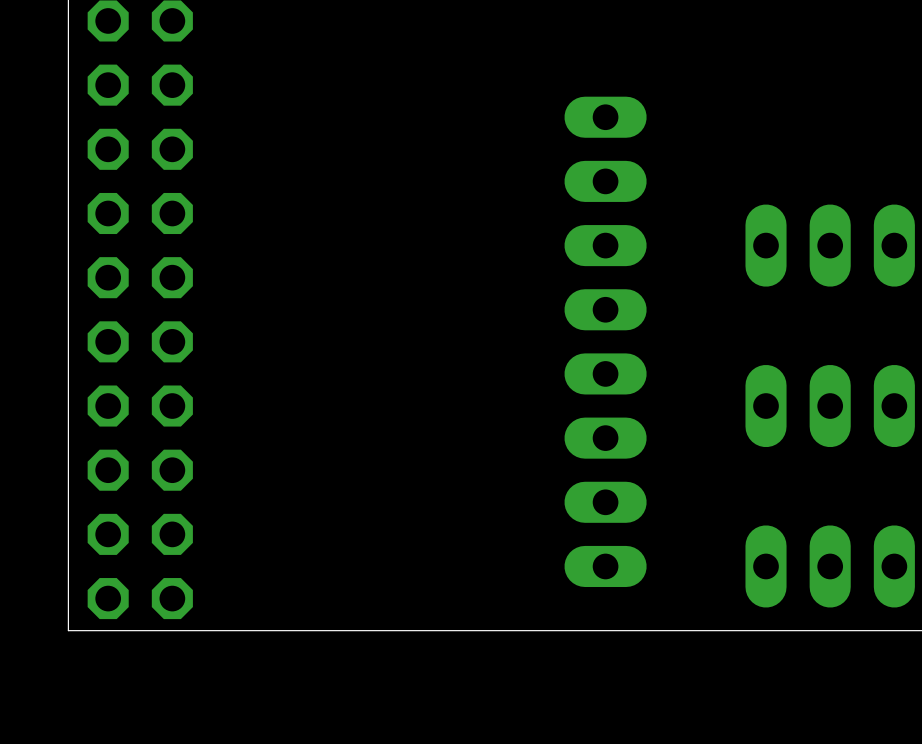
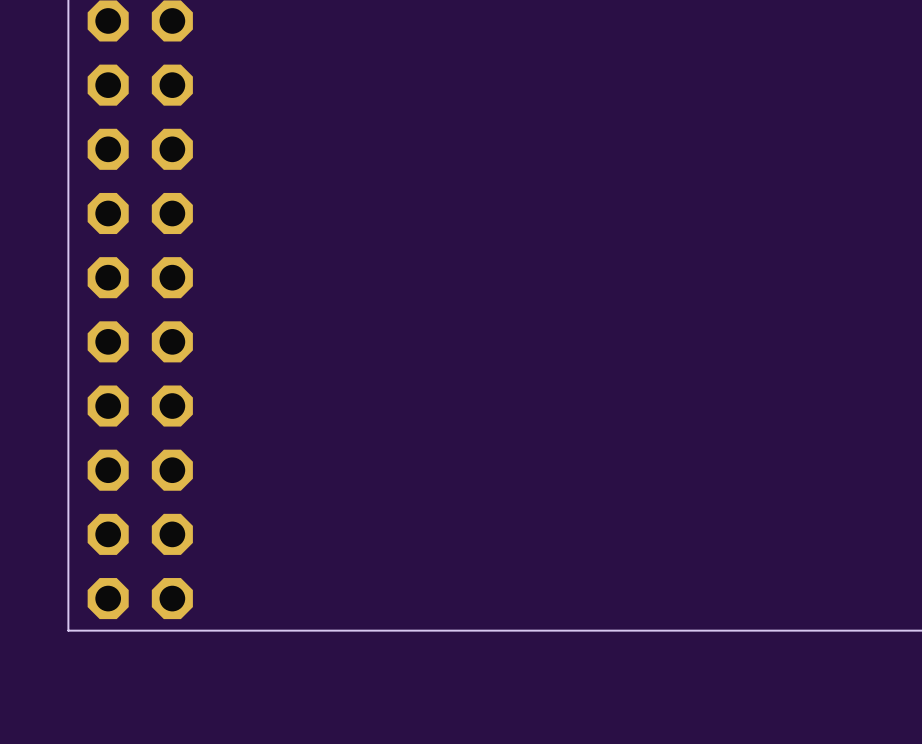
part: (830, 245) -> none
part: (605, 341) -> none
part: (830, 406) -> none
part: (830, 566) -> none

